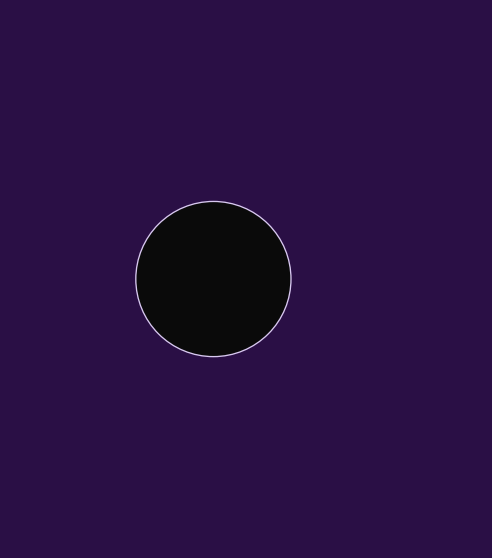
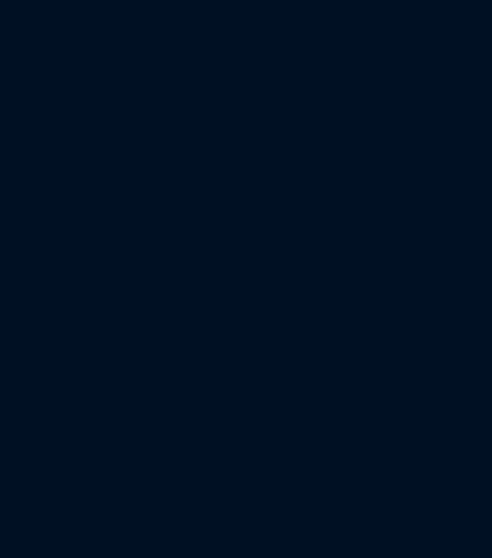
part: (213, 279) -> none

